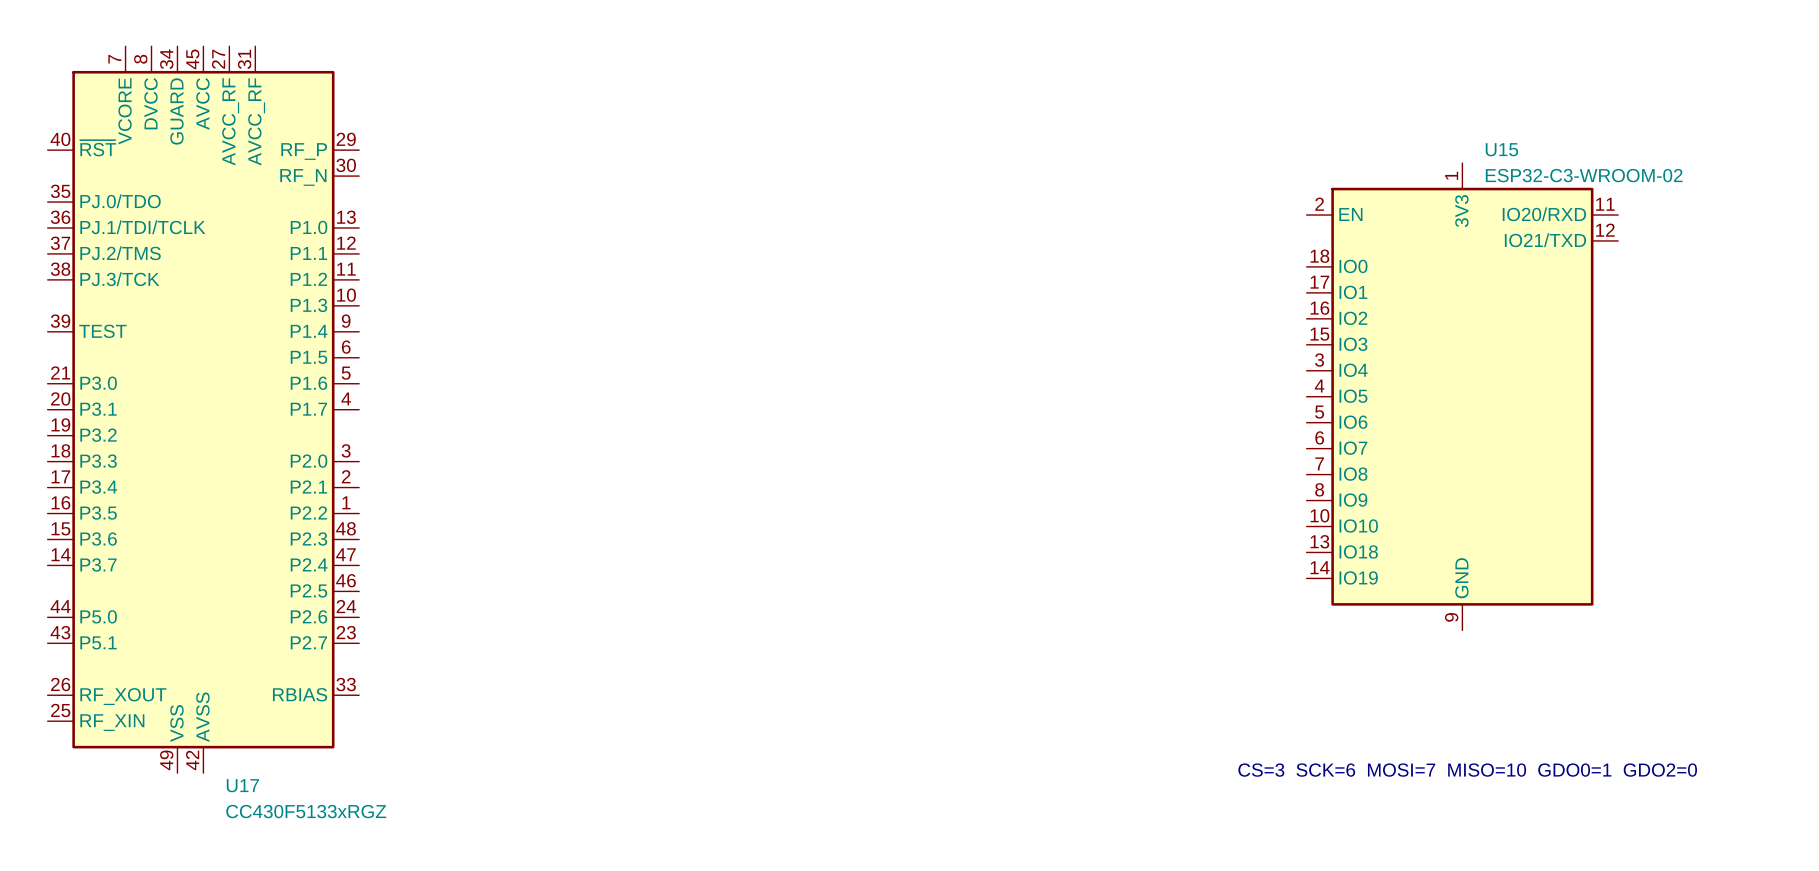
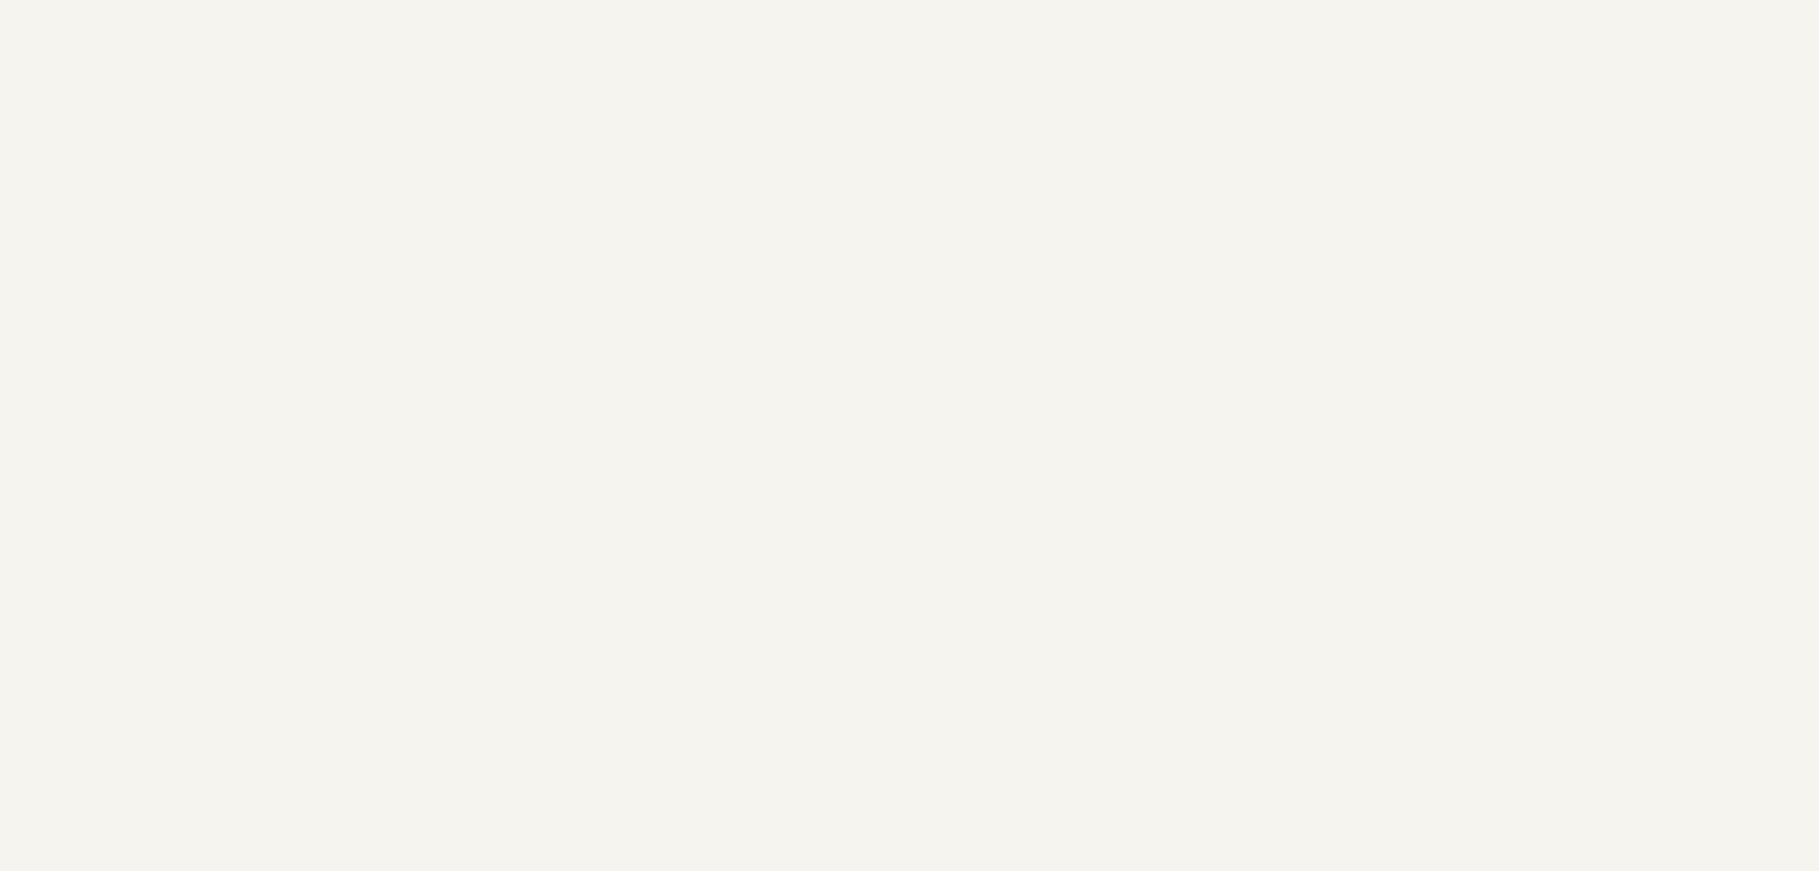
U15: ESP32-C3-WROOM-02 (1462, 396) -> none
U17: CC430F5133xRGZ (203, 409) -> none
text: CS=3 SCK=6 MOSI=7 MISO=10 GDO0=1 GDO2=0 (1467, 770) -> none

